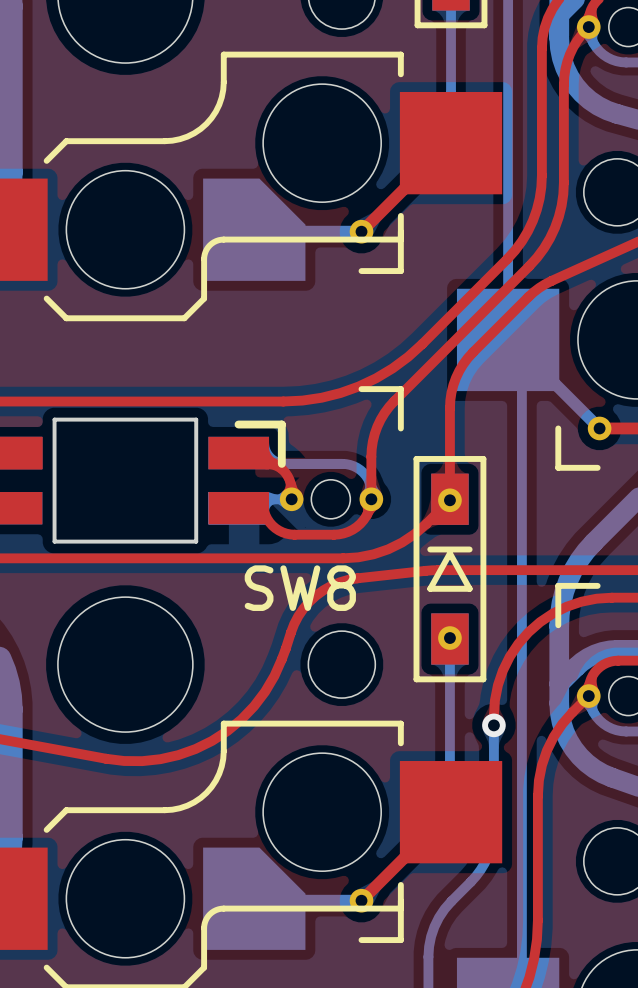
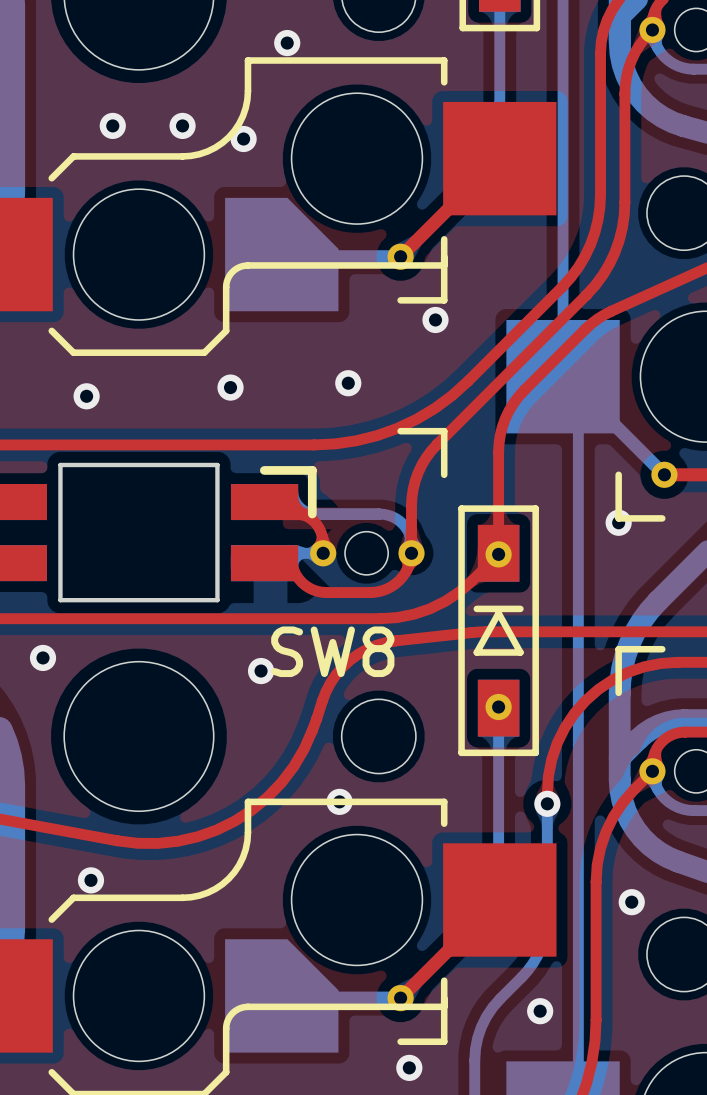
via: none -> (287, 43)
via: none -> (112, 125)
via: none -> (182, 125)
via: none -> (243, 139)
via: none -> (435, 319)
via: none -> (348, 383)
via: none -> (230, 387)
via: none -> (86, 396)
via: none -> (618, 522)
via: none -> (43, 657)
via: none -> (261, 671)
via: none -> (339, 801)
via: none -> (90, 880)
via: none -> (631, 902)
via: none -> (540, 1011)
via: none -> (409, 1067)

